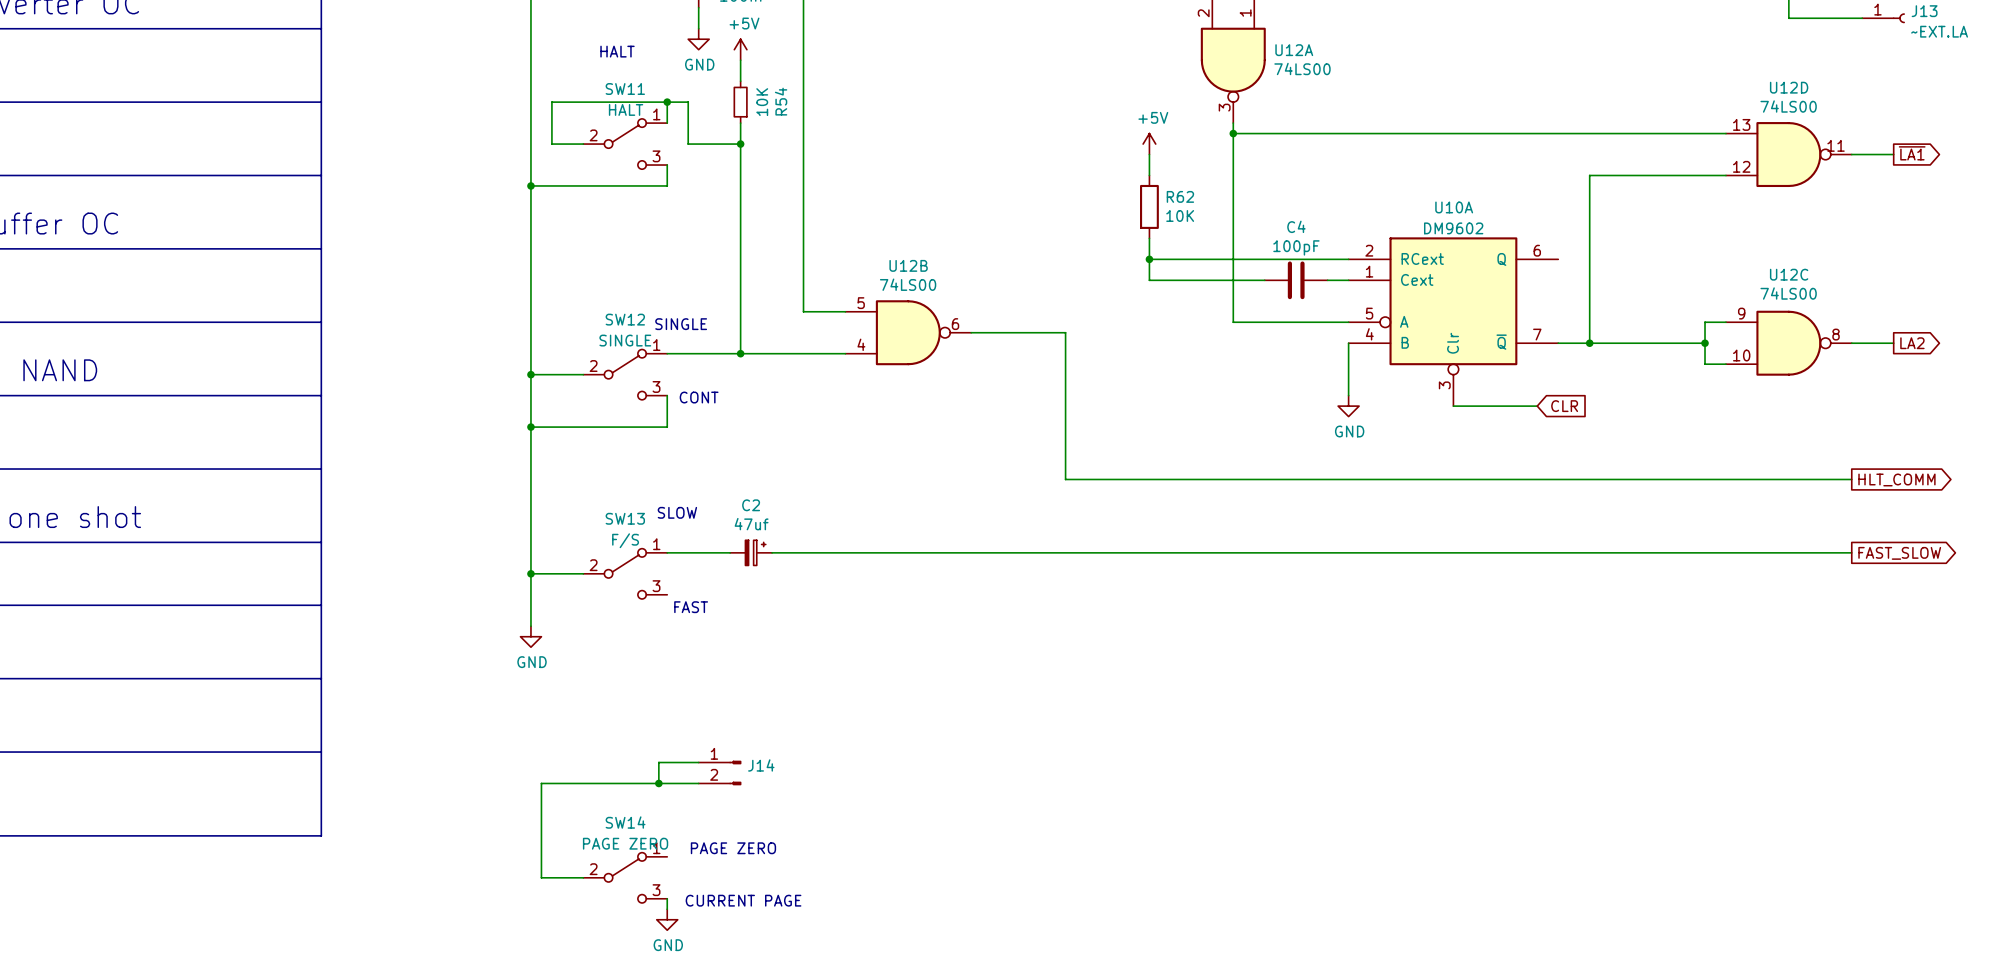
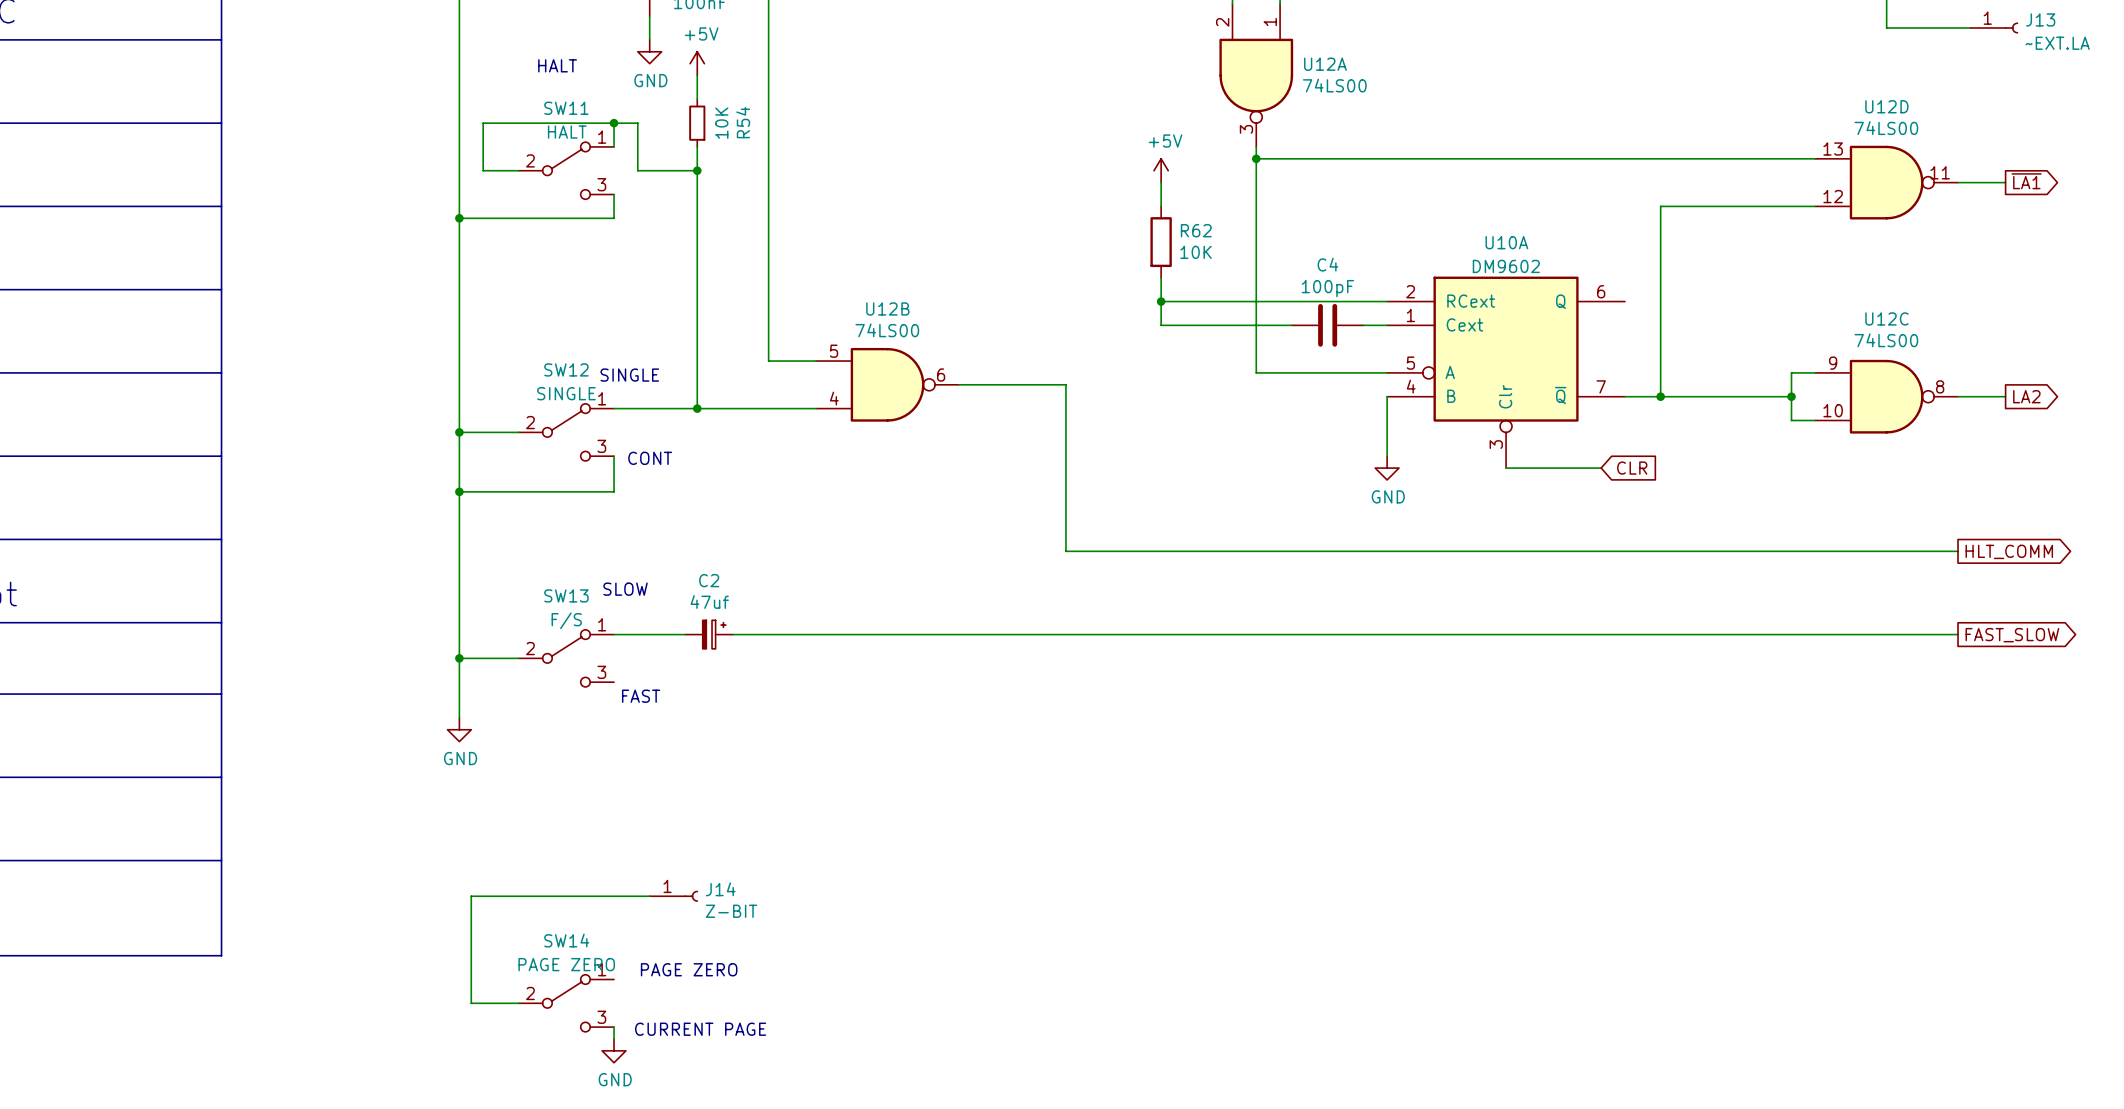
J14 symbol: [698, 760, 742, 786] -> [649, 890, 698, 902]
wire: (698, 762) (658, 762) (658, 783) -> none
junction: (658, 783) -> none
J14 value: none -> Z-BIT (731, 911)

